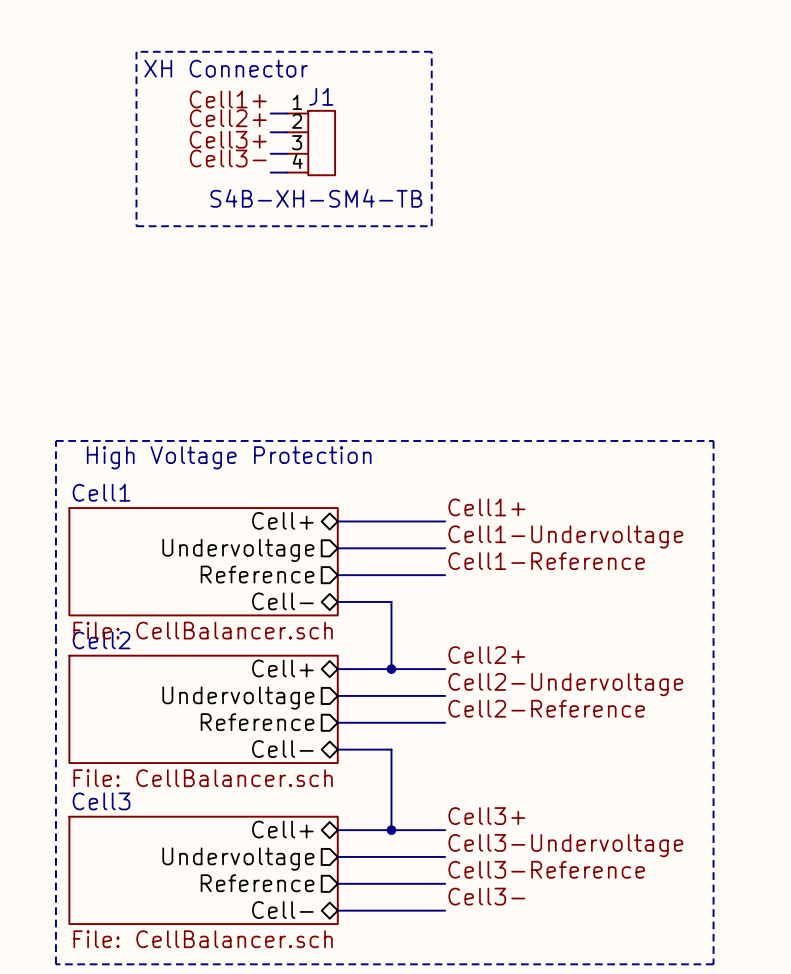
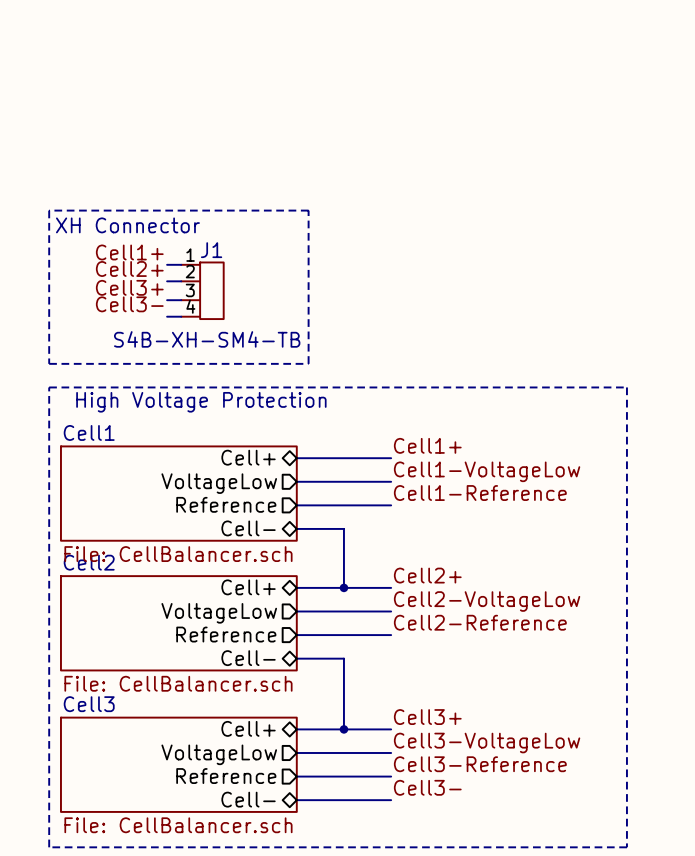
line: (136, 51) (136, 226) (431, 226) (431, 51) (136, 51) -> (49, 210) (49, 363) (308, 363) (308, 210) (49, 210)
text position: XH Connector (226, 68) -> XH Connector (127, 225)
label position: Cell1+ (228, 99) -> Cell1+ (129, 252)
wire: (270, 113) (286, 113) -> (167, 264) (181, 264)
label position: Cell2+ (228, 118) -> Cell2+ (129, 268)
wire: (270, 132) (286, 132) -> (167, 281) (181, 281)
label position: Cell3+ (228, 139) -> Cell3+ (129, 287)
J1 position: (310, 143) -> (202, 290)
wire: (270, 153) (286, 153) -> (167, 300) (181, 300)
label position: Cell3- (228, 158) -> Cell3- (129, 304)
wire: (270, 172) (286, 172) -> (167, 316) (181, 316)
label: Cell1-Undervoltage (565, 536) -> Cell1-VoltageLow (487, 471)
sheet pin: Undervoltage (238, 550) -> VoltageLow (219, 483)
label: Cell2-Undervoltage (565, 684) -> Cell2-VoltageLow (487, 601)
sheet pin: Undervoltage (238, 698) -> VoltageLow (219, 613)
label: Cell3-Undervoltage (565, 845) -> Cell3-VoltageLow (487, 743)
sheet pin: Undervoltage (238, 859) -> VoltageLow (219, 754)

